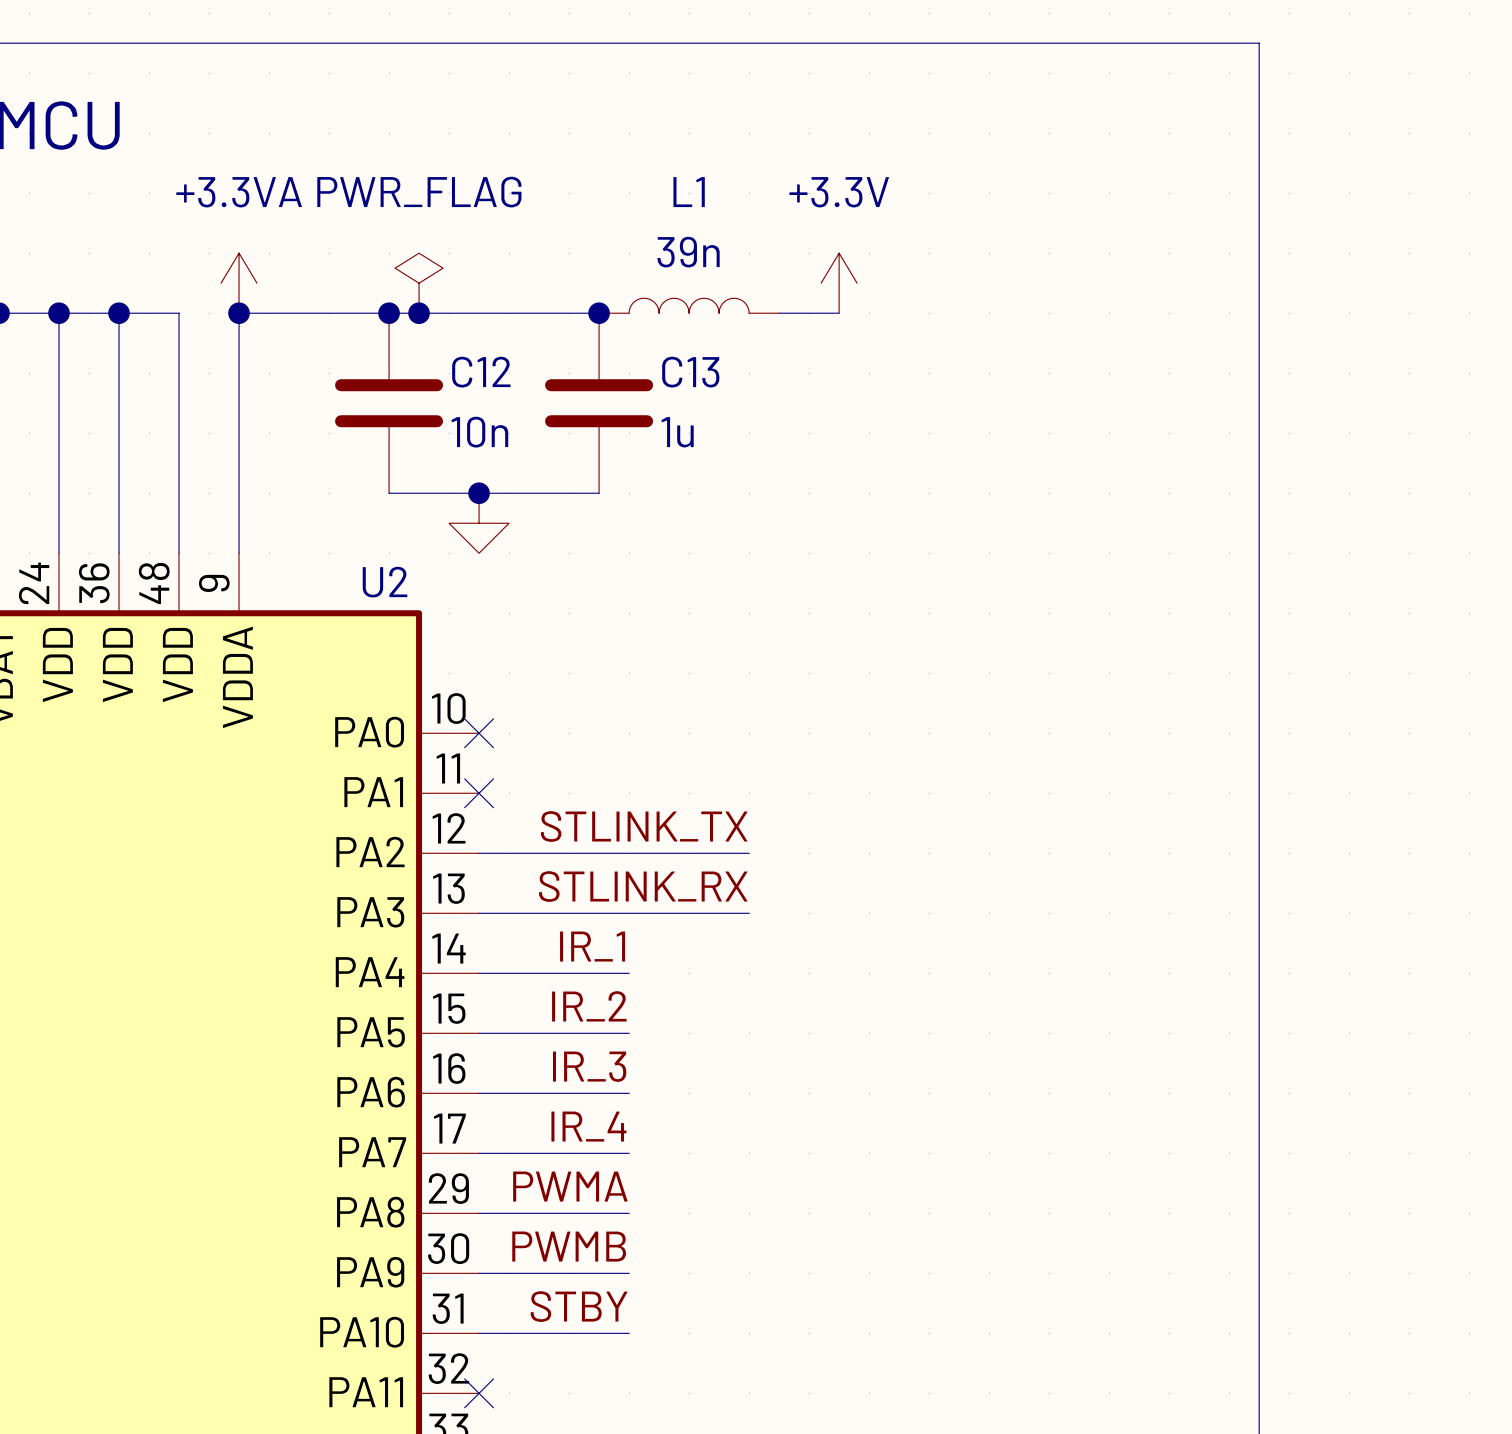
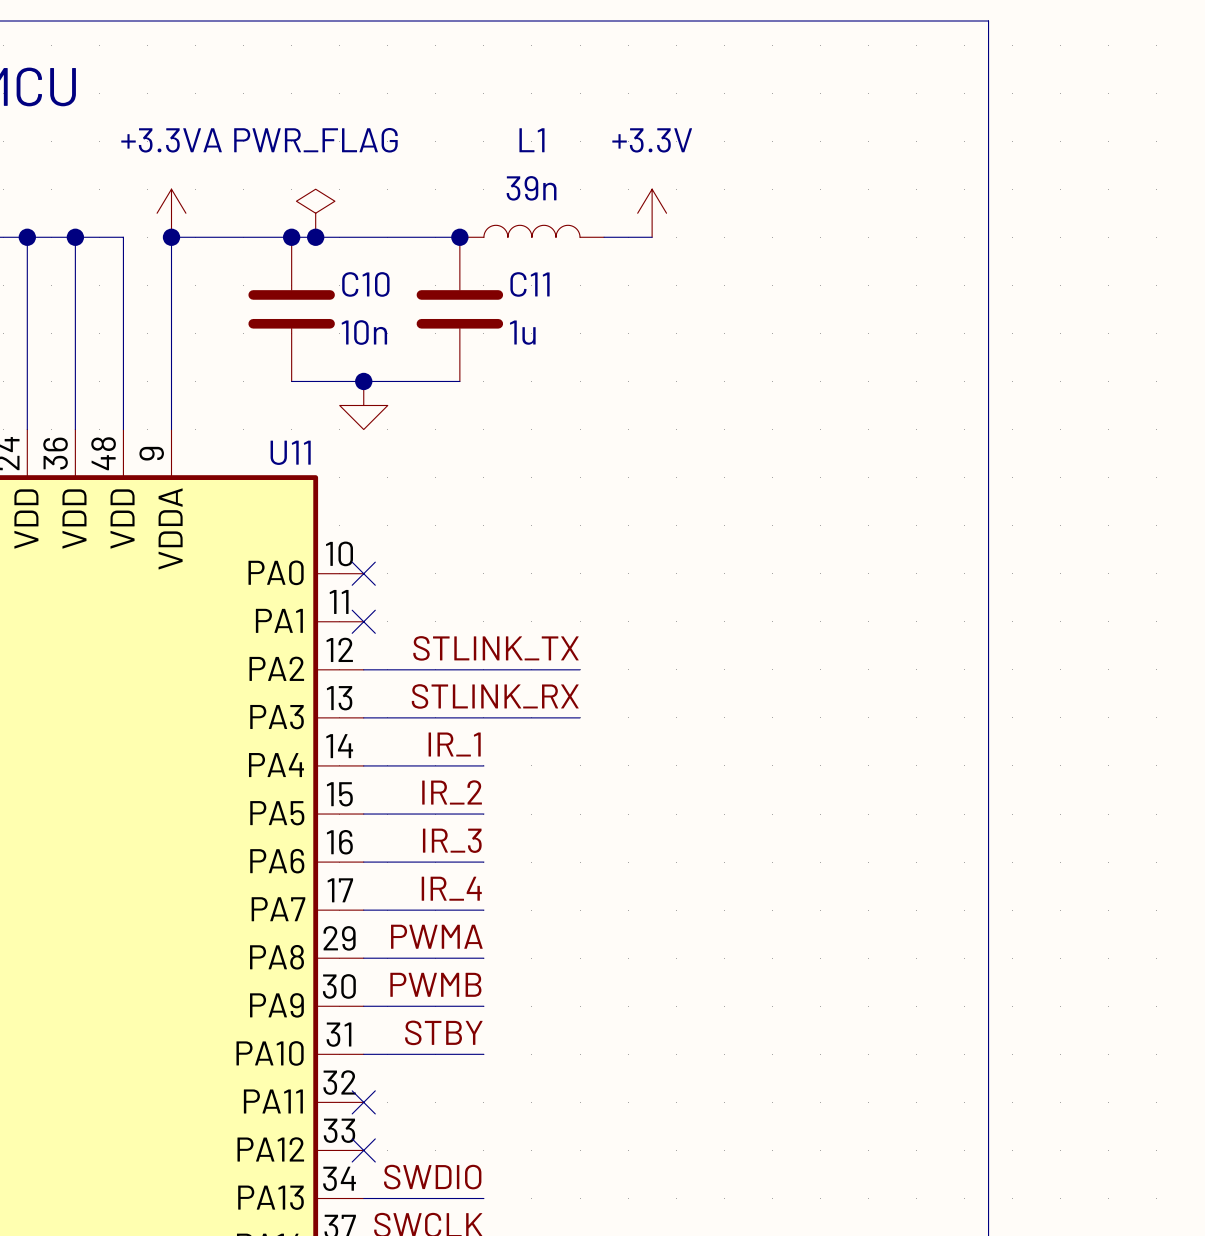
C12 name: C12 (481, 372) -> C10 (365, 284)
C13 name: C13 (690, 372) -> C11 (530, 284)
U2 name: U2 (385, 582) -> U11 (290, 452)

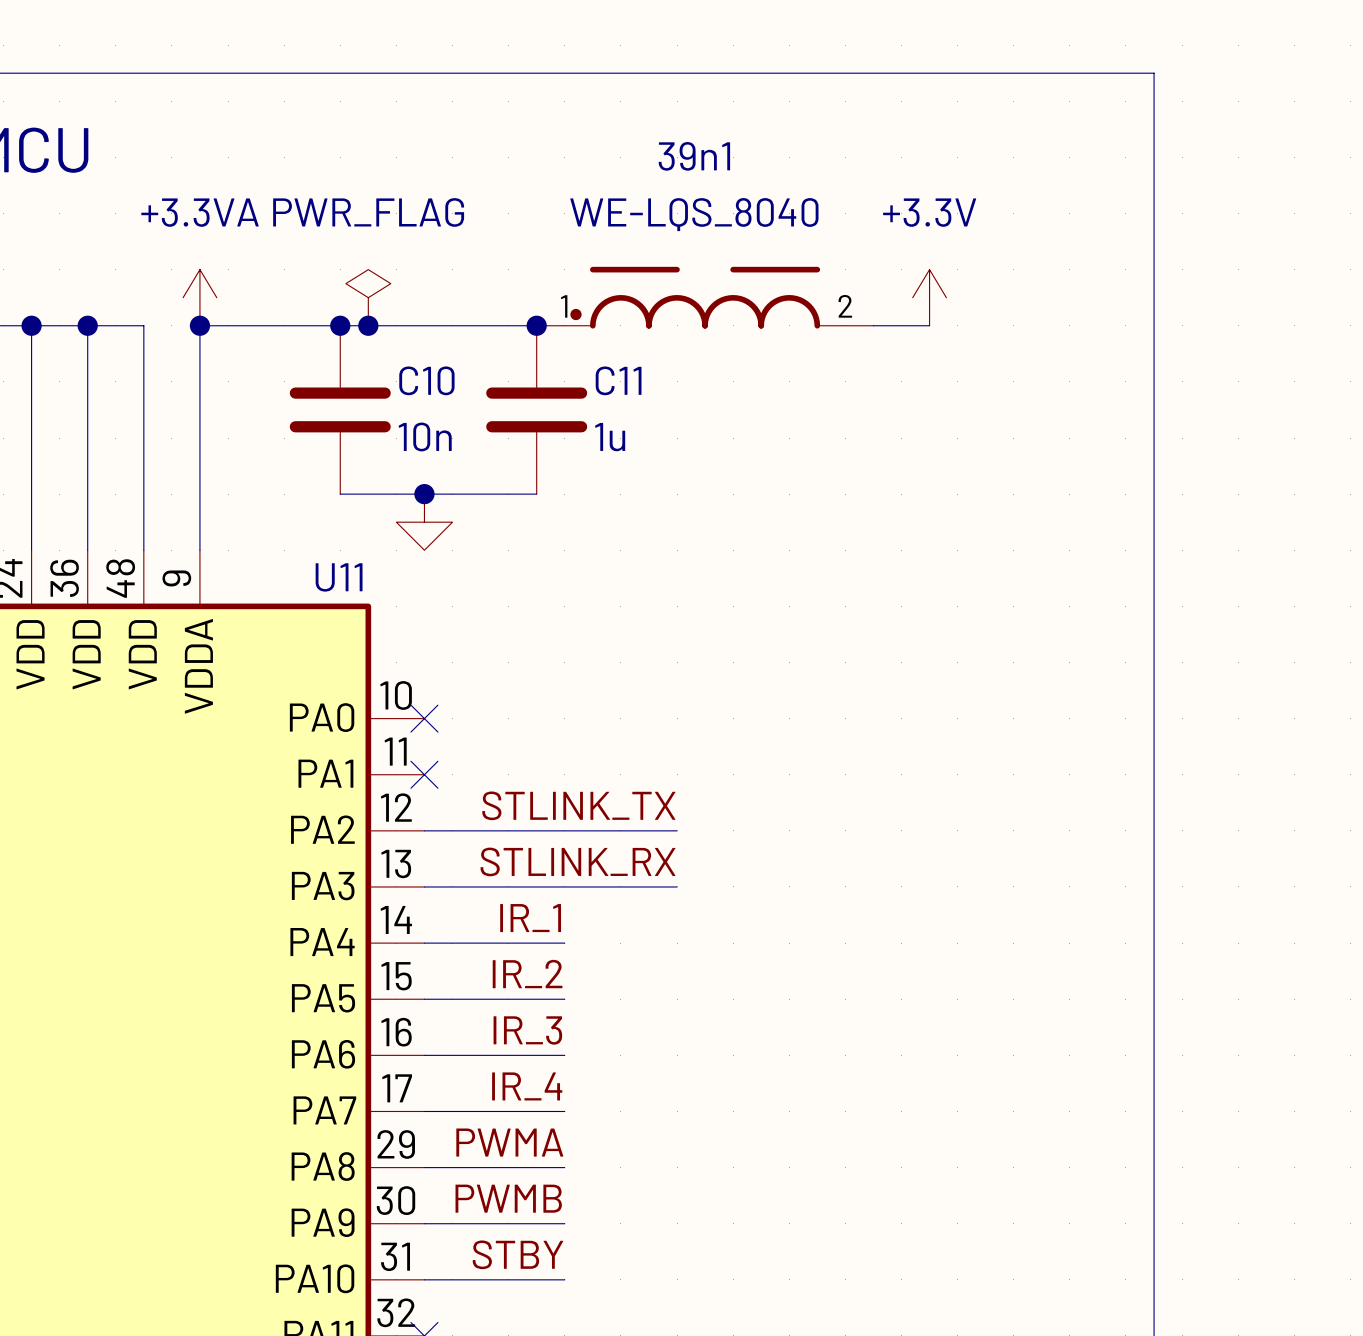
39n1: none -> WE-LQS_8040 (705, 297)
power symbol position: +3.3V (652, 213) -> +3.3V (929, 297)
L1: 39n (531, 231) -> none
wire: (604, 237) (652, 237) -> (873, 325) (929, 325)

